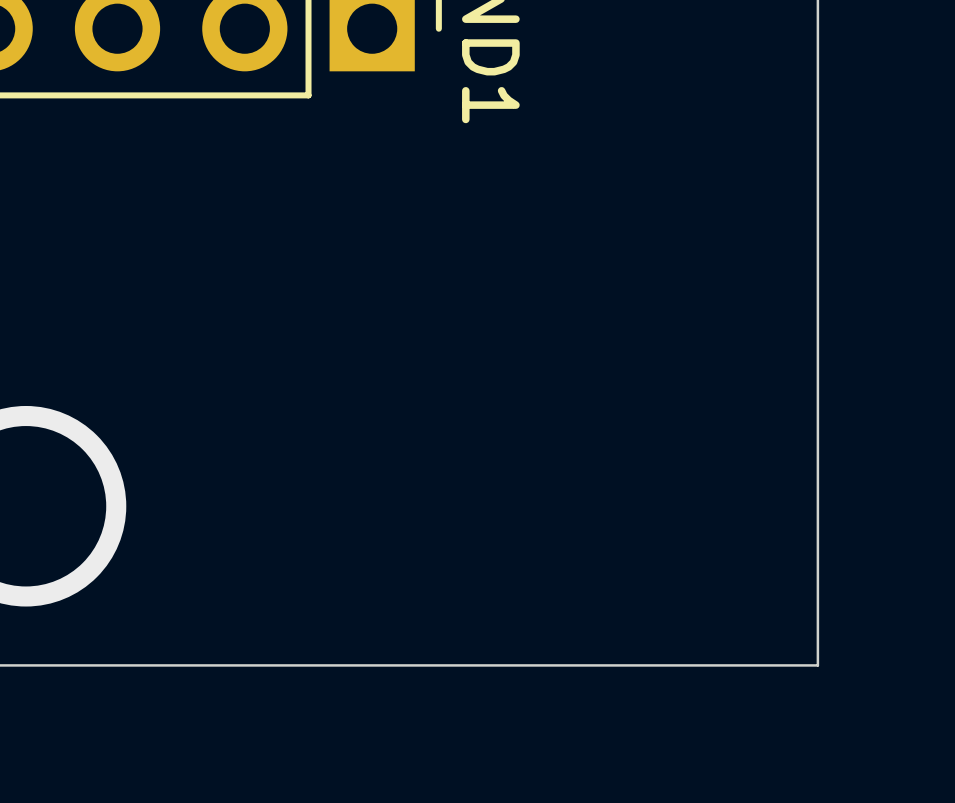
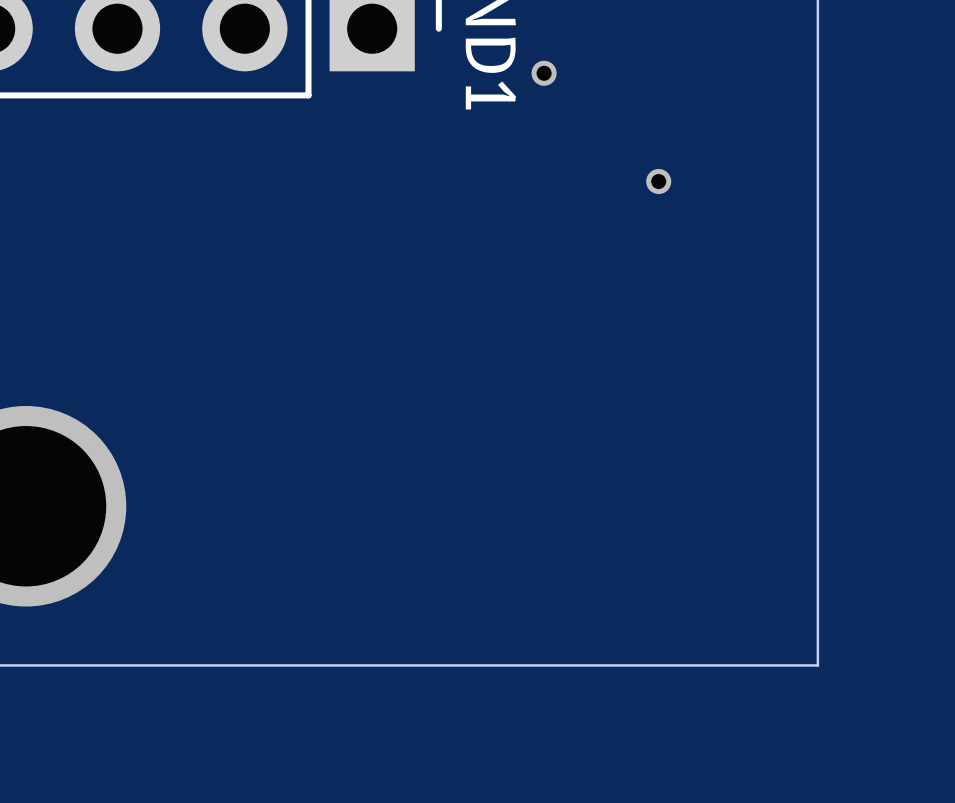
via: none -> (544, 73)
via: none -> (658, 181)

